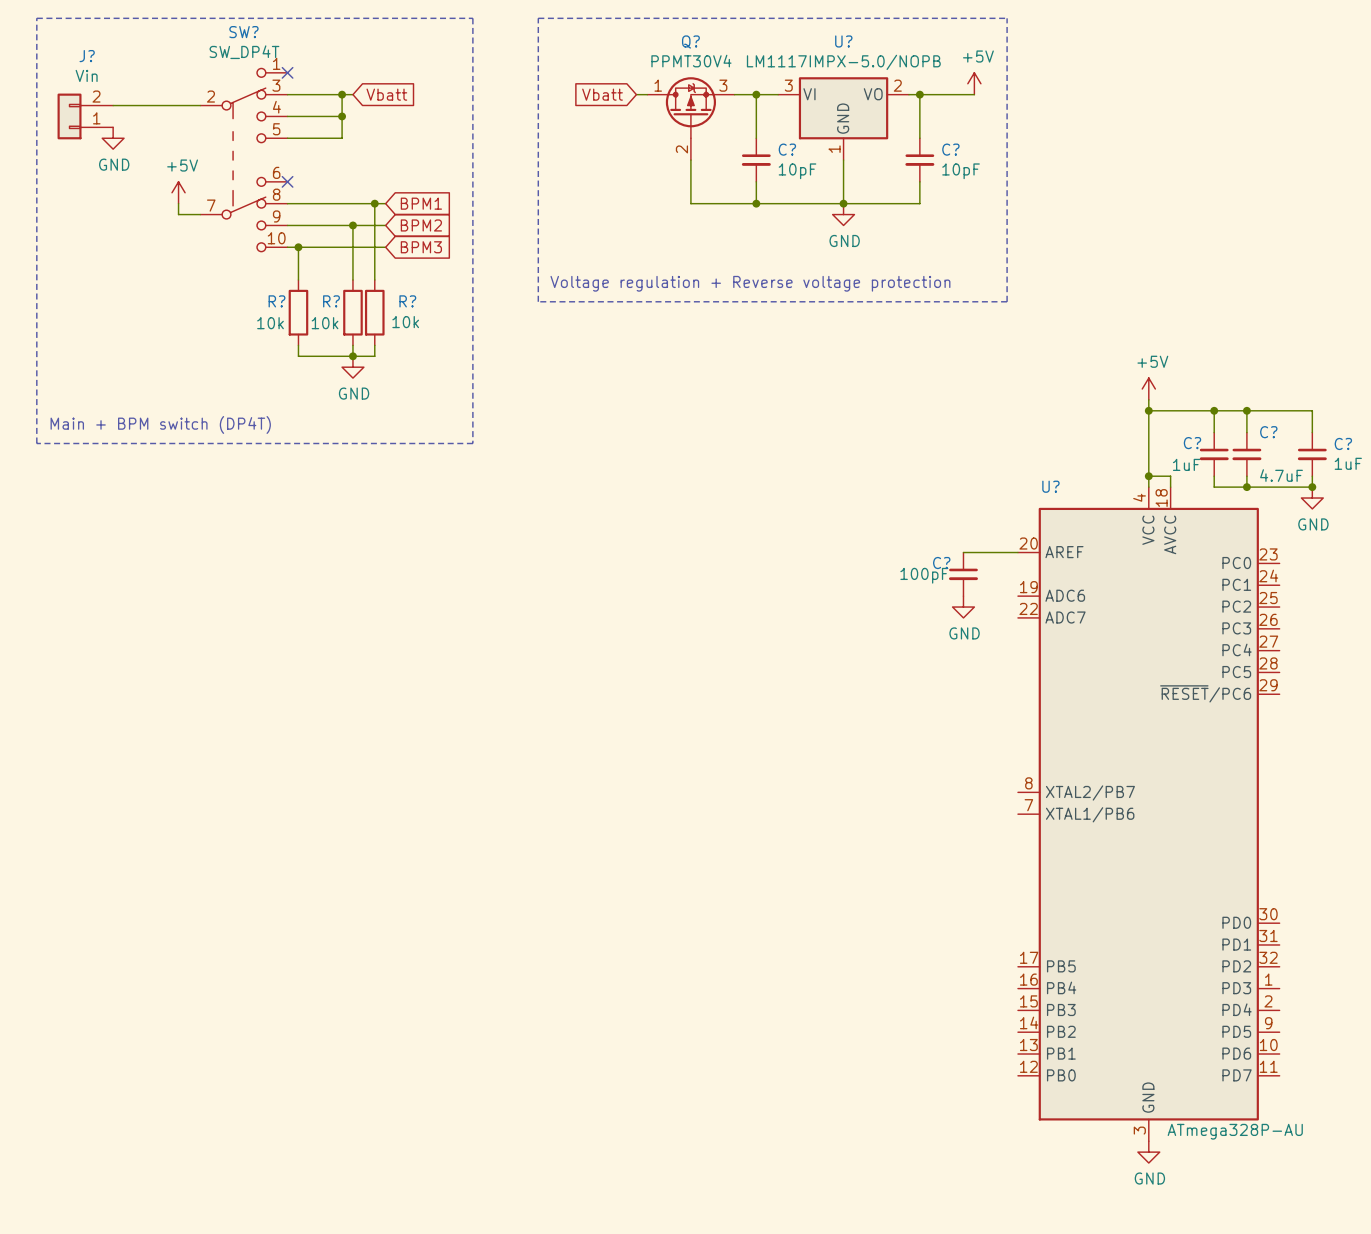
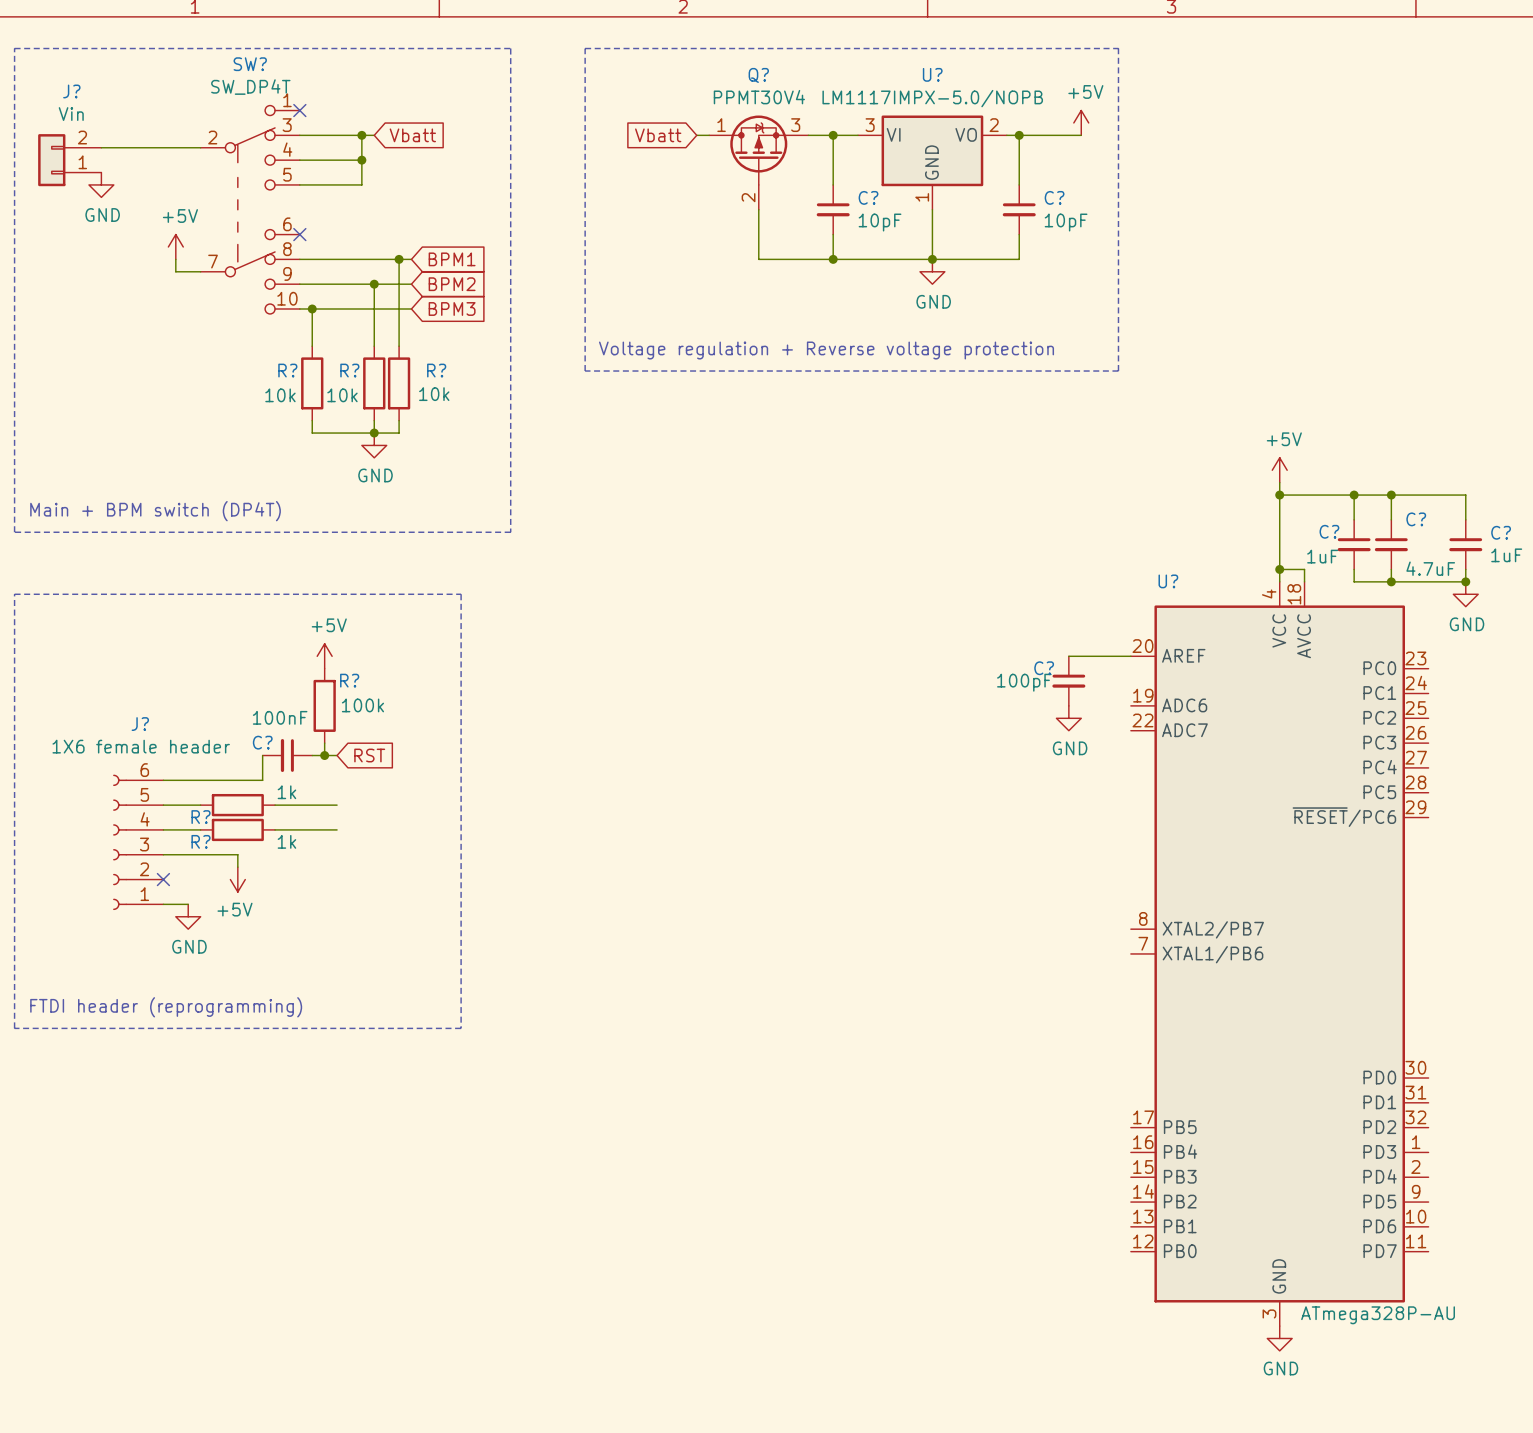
line: none -> (14, 594) (14, 1028) (461, 1028) (461, 594) (14, 594)
power symbol: none -> +5V (324, 656)
R?: none -> 100k (324, 705)
wire: none -> (324, 743) (324, 755)
wire: none -> (262, 755) (262, 780) (163, 780)
C?: none -> 100nF (287, 755)
wire: none -> (312, 755) (337, 755)
junction: none -> (324, 755)
global label: none -> RST (369, 755)
wire: none -> (163, 805) (200, 805)
R?: none -> 1k (237, 805)
wire: none -> (275, 805) (337, 805)
wire: none -> (163, 829) (200, 829)
R?: none -> 1k (237, 829)
wire: none -> (275, 829) (337, 829)
J?: none -> 1X6 female header (138, 842)
wire: none -> (163, 854) (237, 854) (237, 867)
no-connect mark: none -> (163, 879)
power symbol: none -> +5V (237, 879)
wire: none -> (163, 904) (188, 904)
power symbol: none -> GND (188, 916)
text: none -> FTDI header (reprogramming) (166, 1007)

